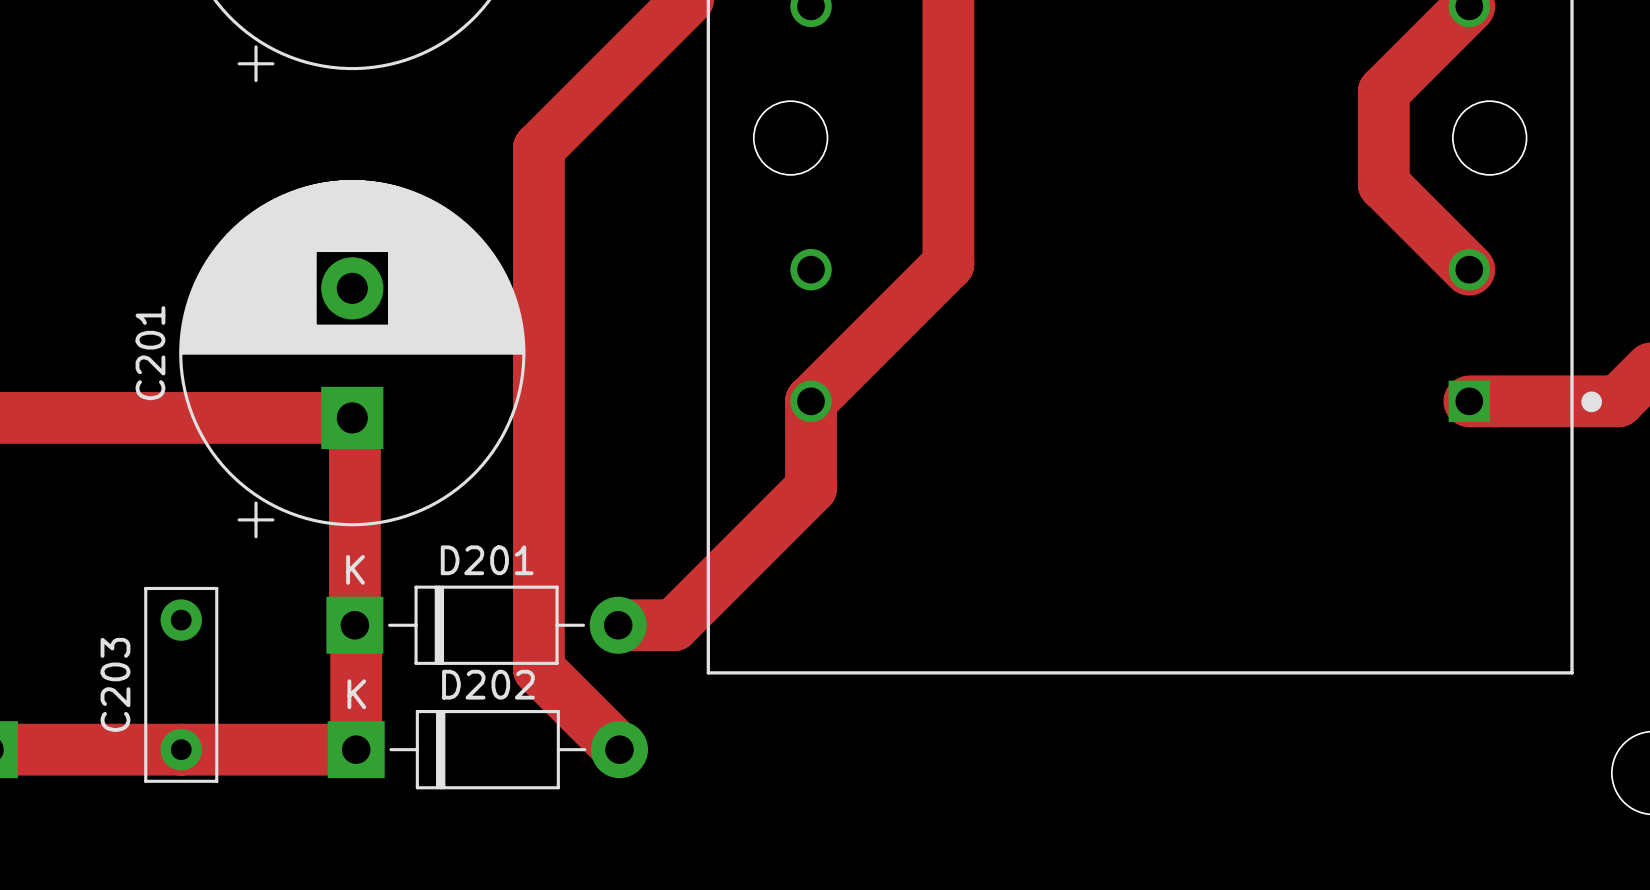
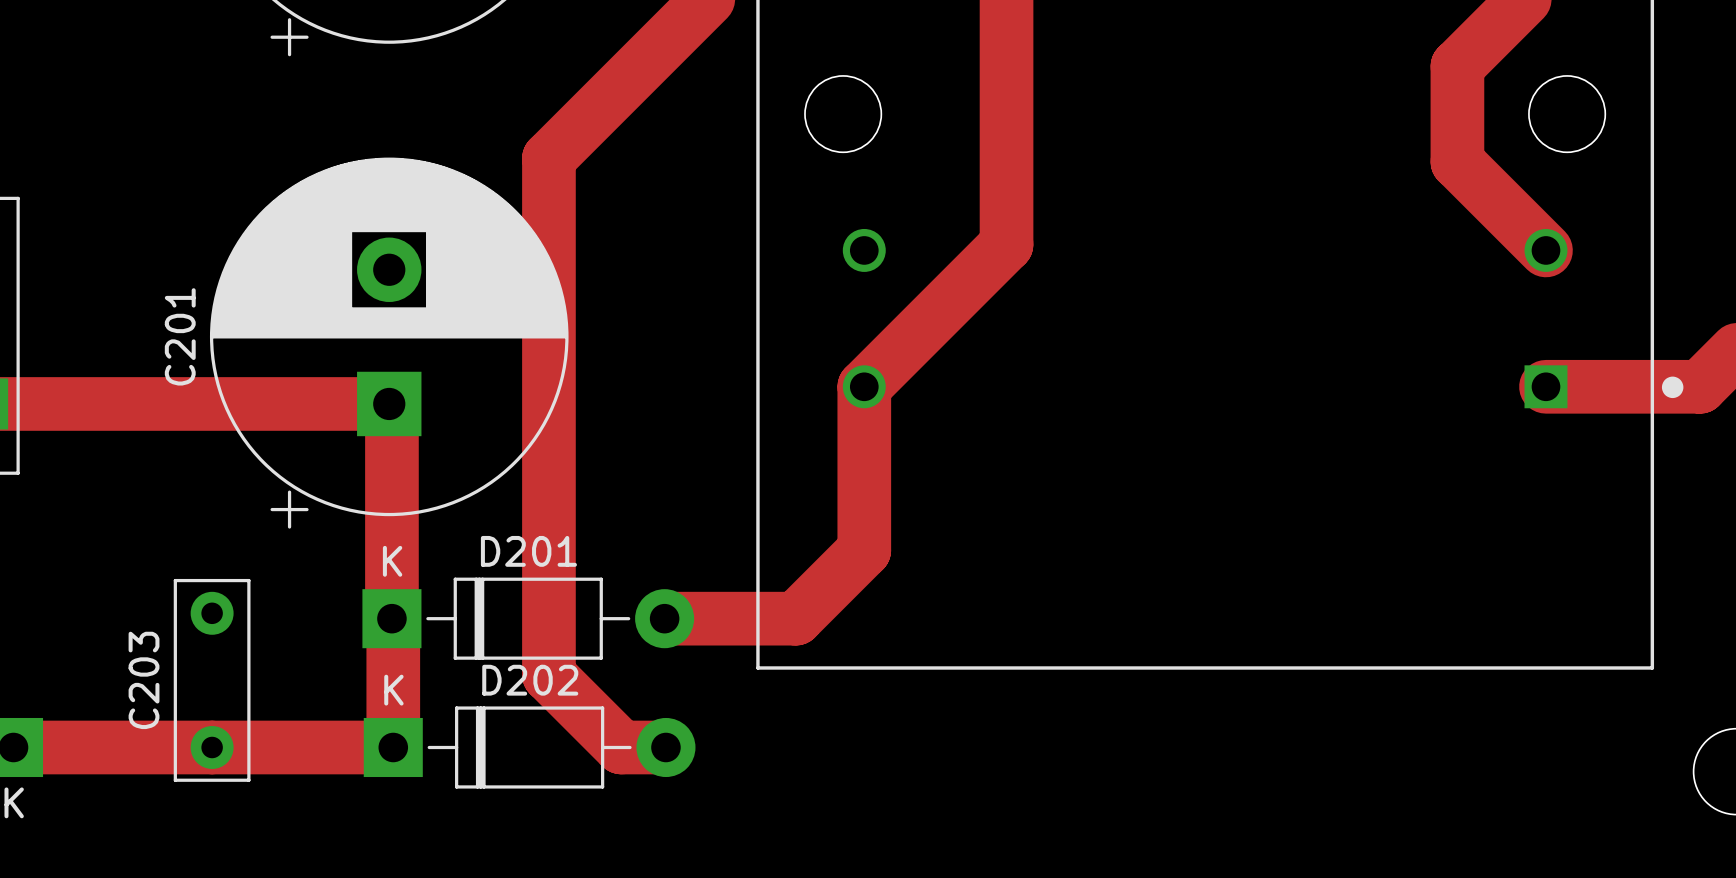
track: (538, 148) (538, 669) (619, 749) -> (582, 124) (548, 158) (548, 675) (621, 747) (665, 747)
track: (811, 487) (673, 625) -> (864, 476) (864, 550) (795, 618) (722, 618)

